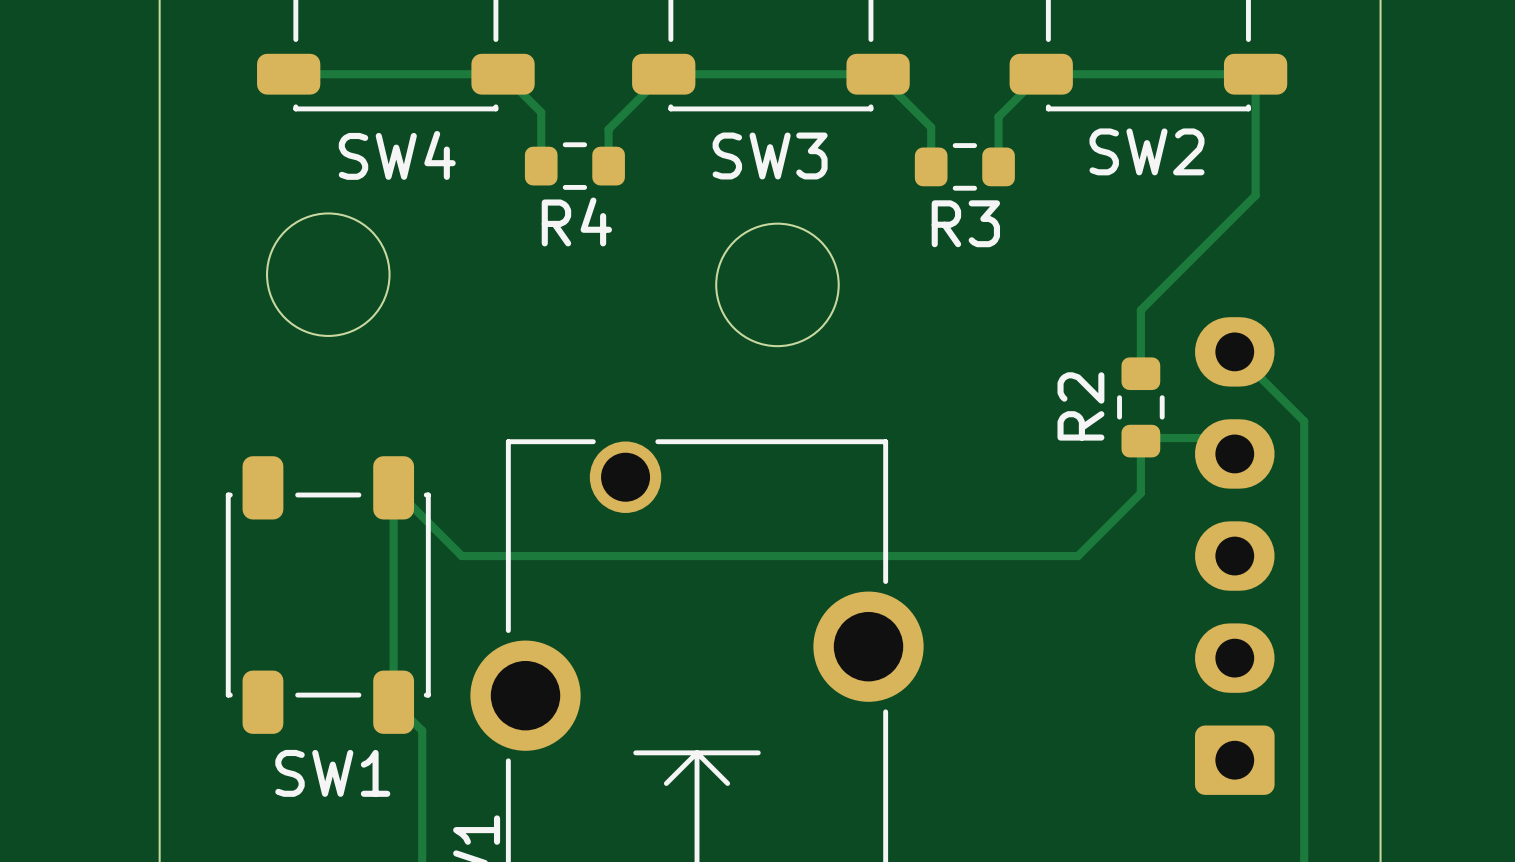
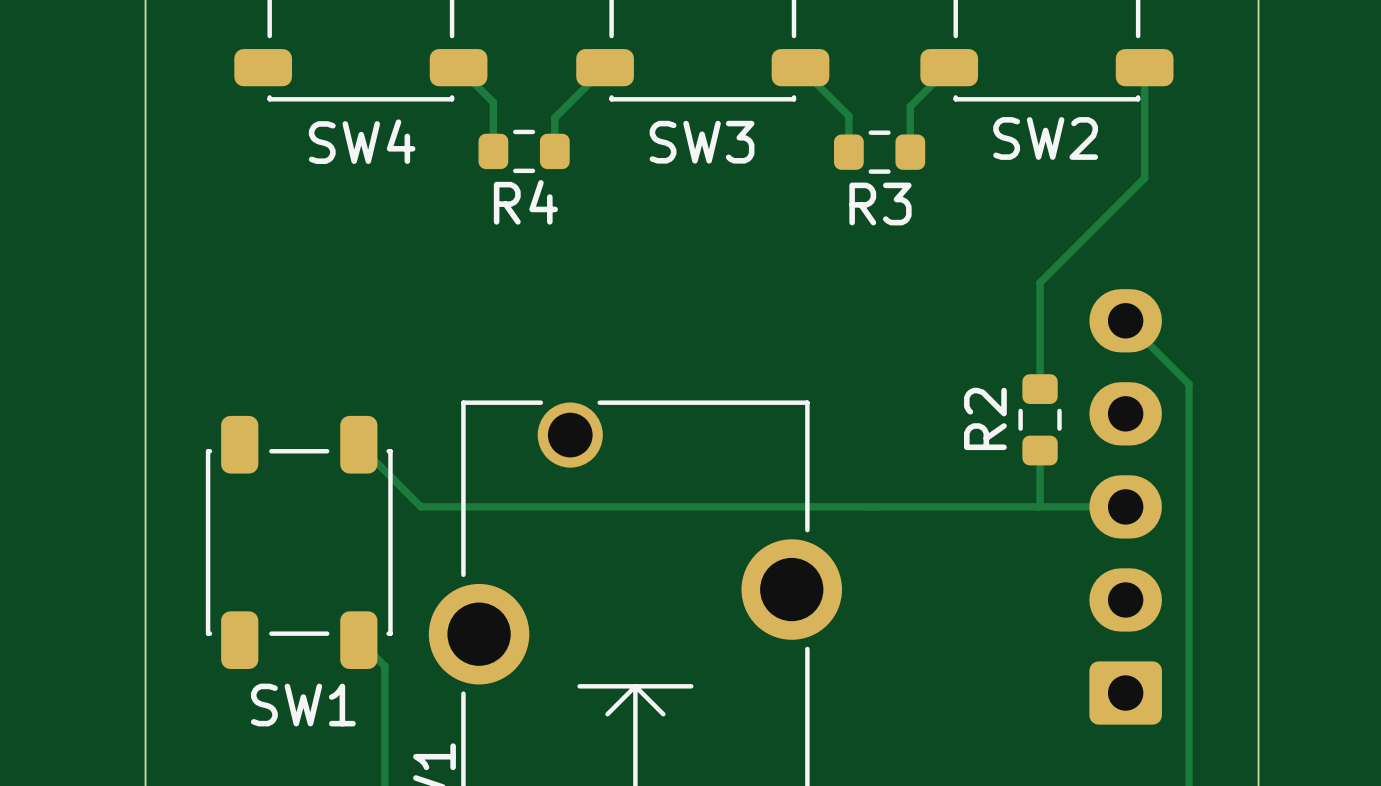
track: (288, 74) (503, 74) -> none
track: (663, 74) (878, 74) -> none
track: (1041, 74) (1255, 74) -> none
round board edge: [266, 212, 391, 337] -> none
round board edge: [715, 222, 840, 348] -> none
track: none -> (1040, 340) (1040, 389)
R2 position: (1140, 407) -> (1040, 419)
track: (1234, 453) (1218, 438) (1143, 438) (1140, 441) (1140, 493) (1077, 556) -> (1125, 506) (982, 506)
track: (393, 487) (393, 702) -> none
track: none -> (1040, 450) (1040, 505) (1038, 506)

